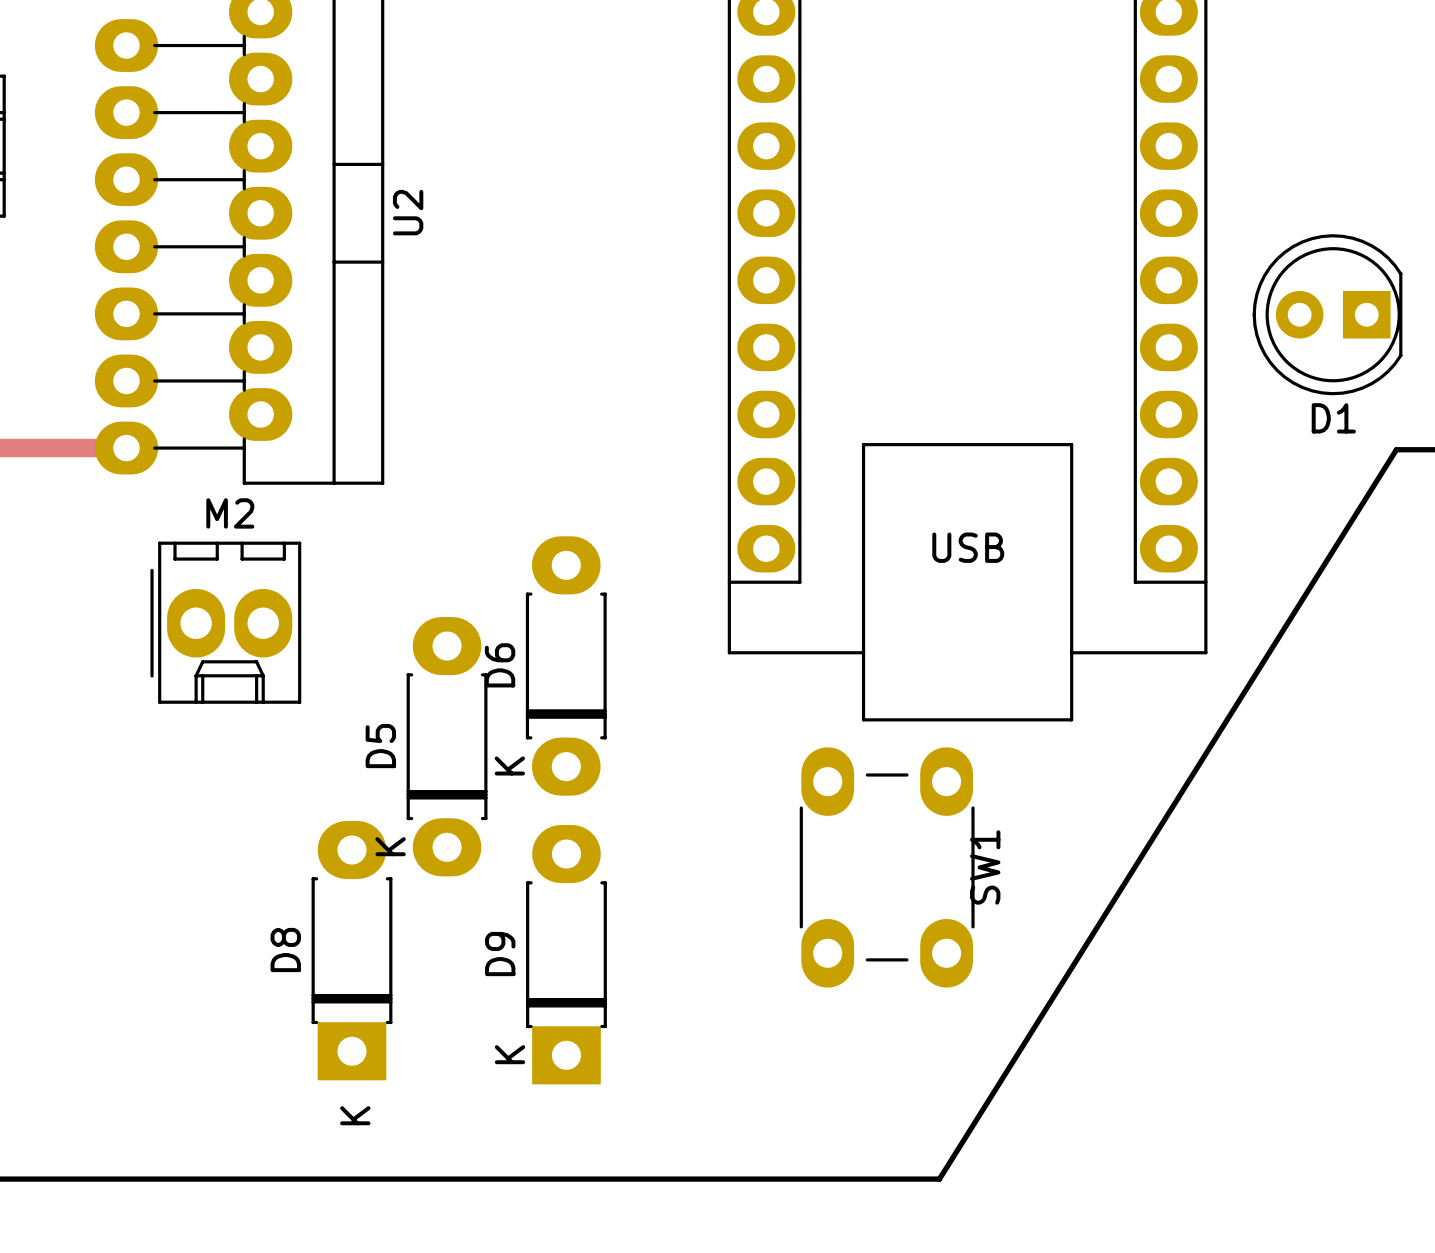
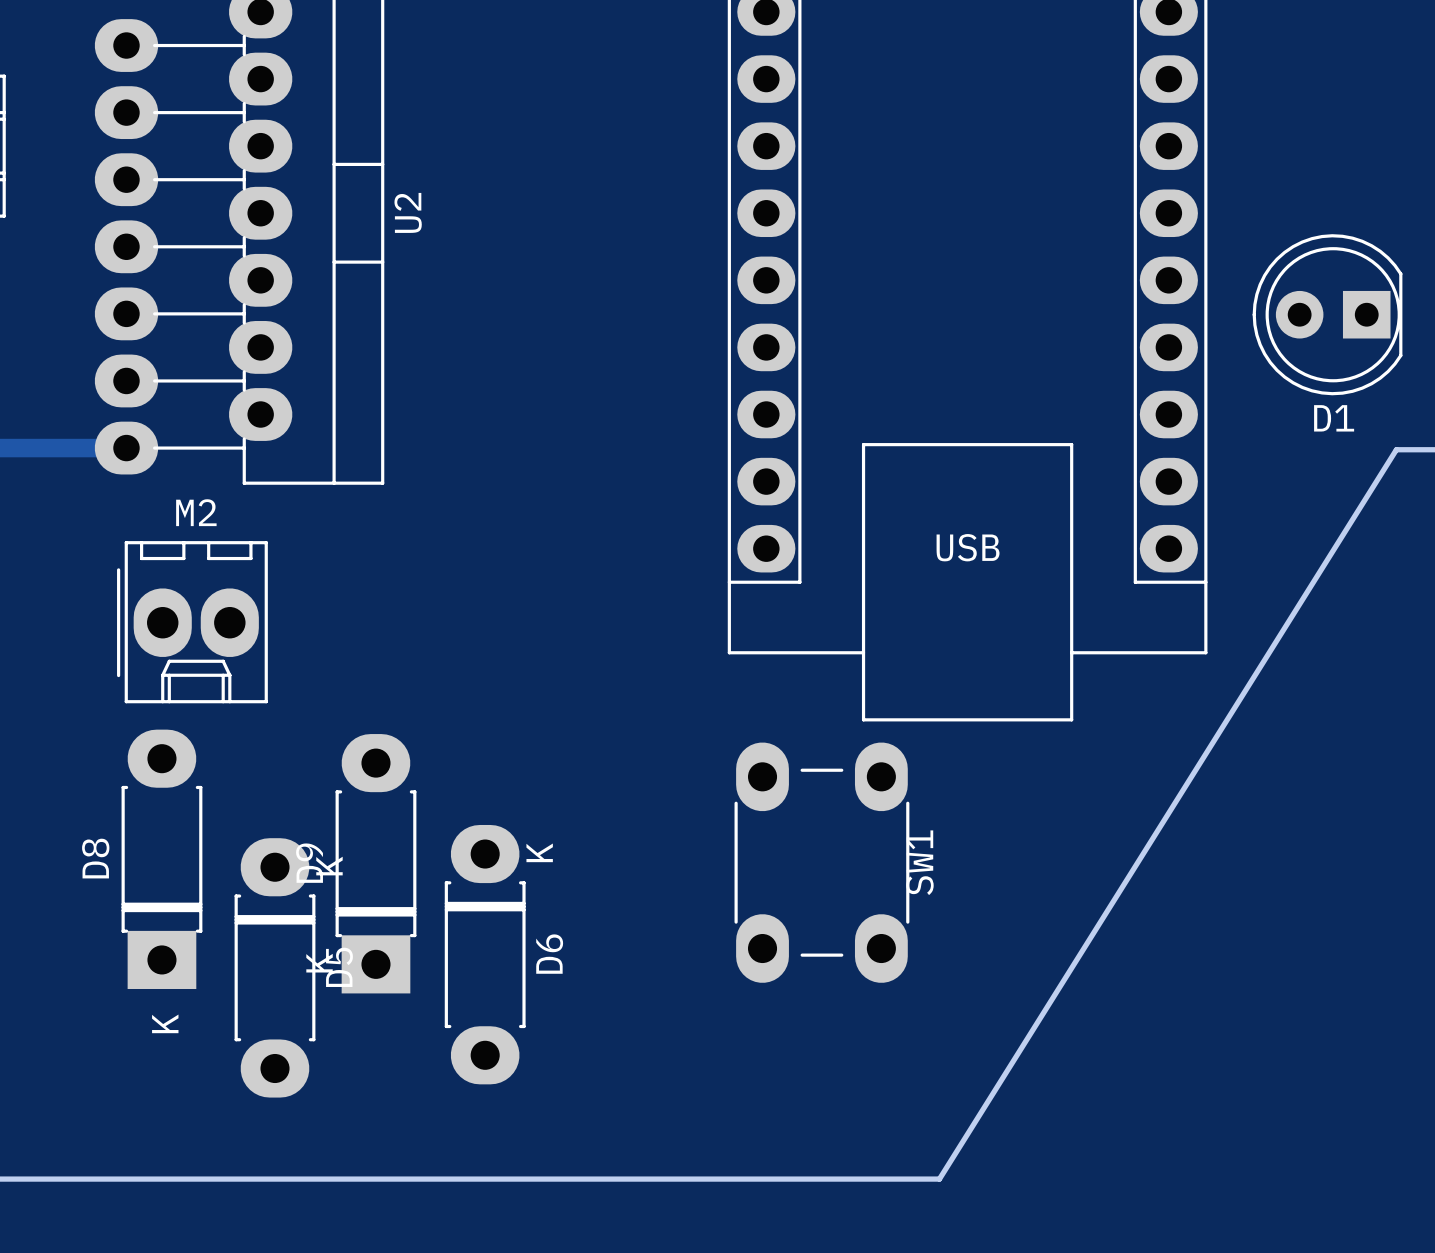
M2 position: (225, 622) -> (192, 622)
D6 rotation: 0° (566, 665) -> 180° (485, 954)
D6 position: (566, 665) -> (485, 954)
D5 rotation: 0° (447, 746) -> 180° (275, 967)
D5 position: (447, 746) -> (275, 967)
SW1 position: (887, 867) -> (821, 862)
D8 position: (351, 950) -> (161, 859)
D9 position: (566, 954) -> (375, 863)

